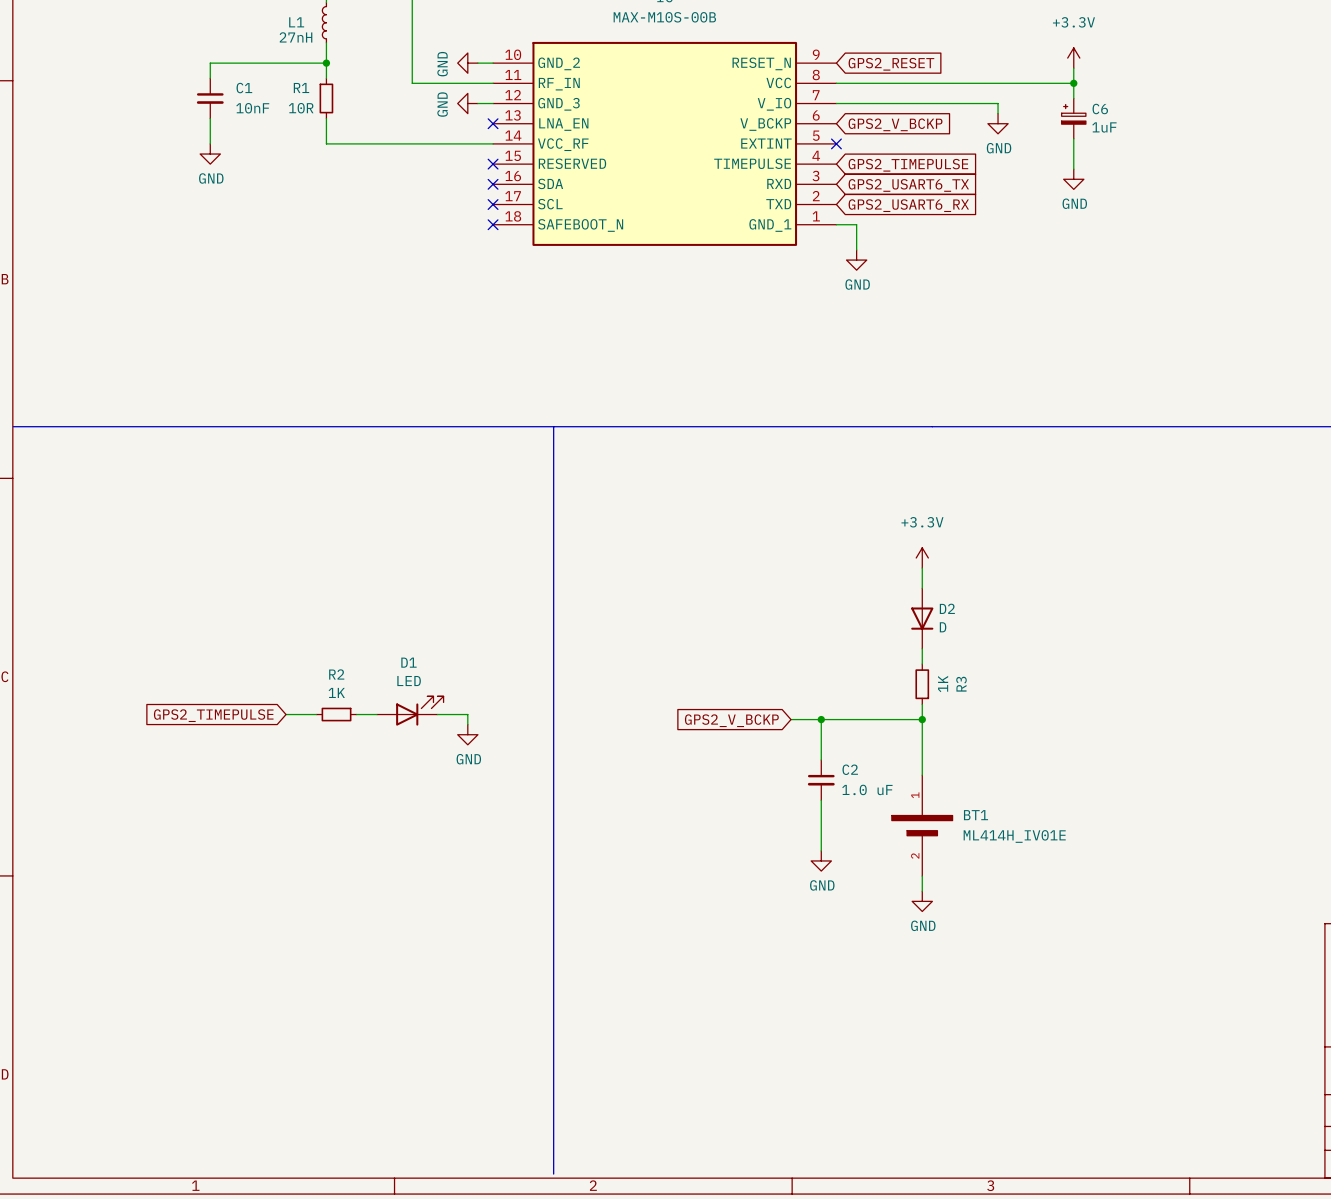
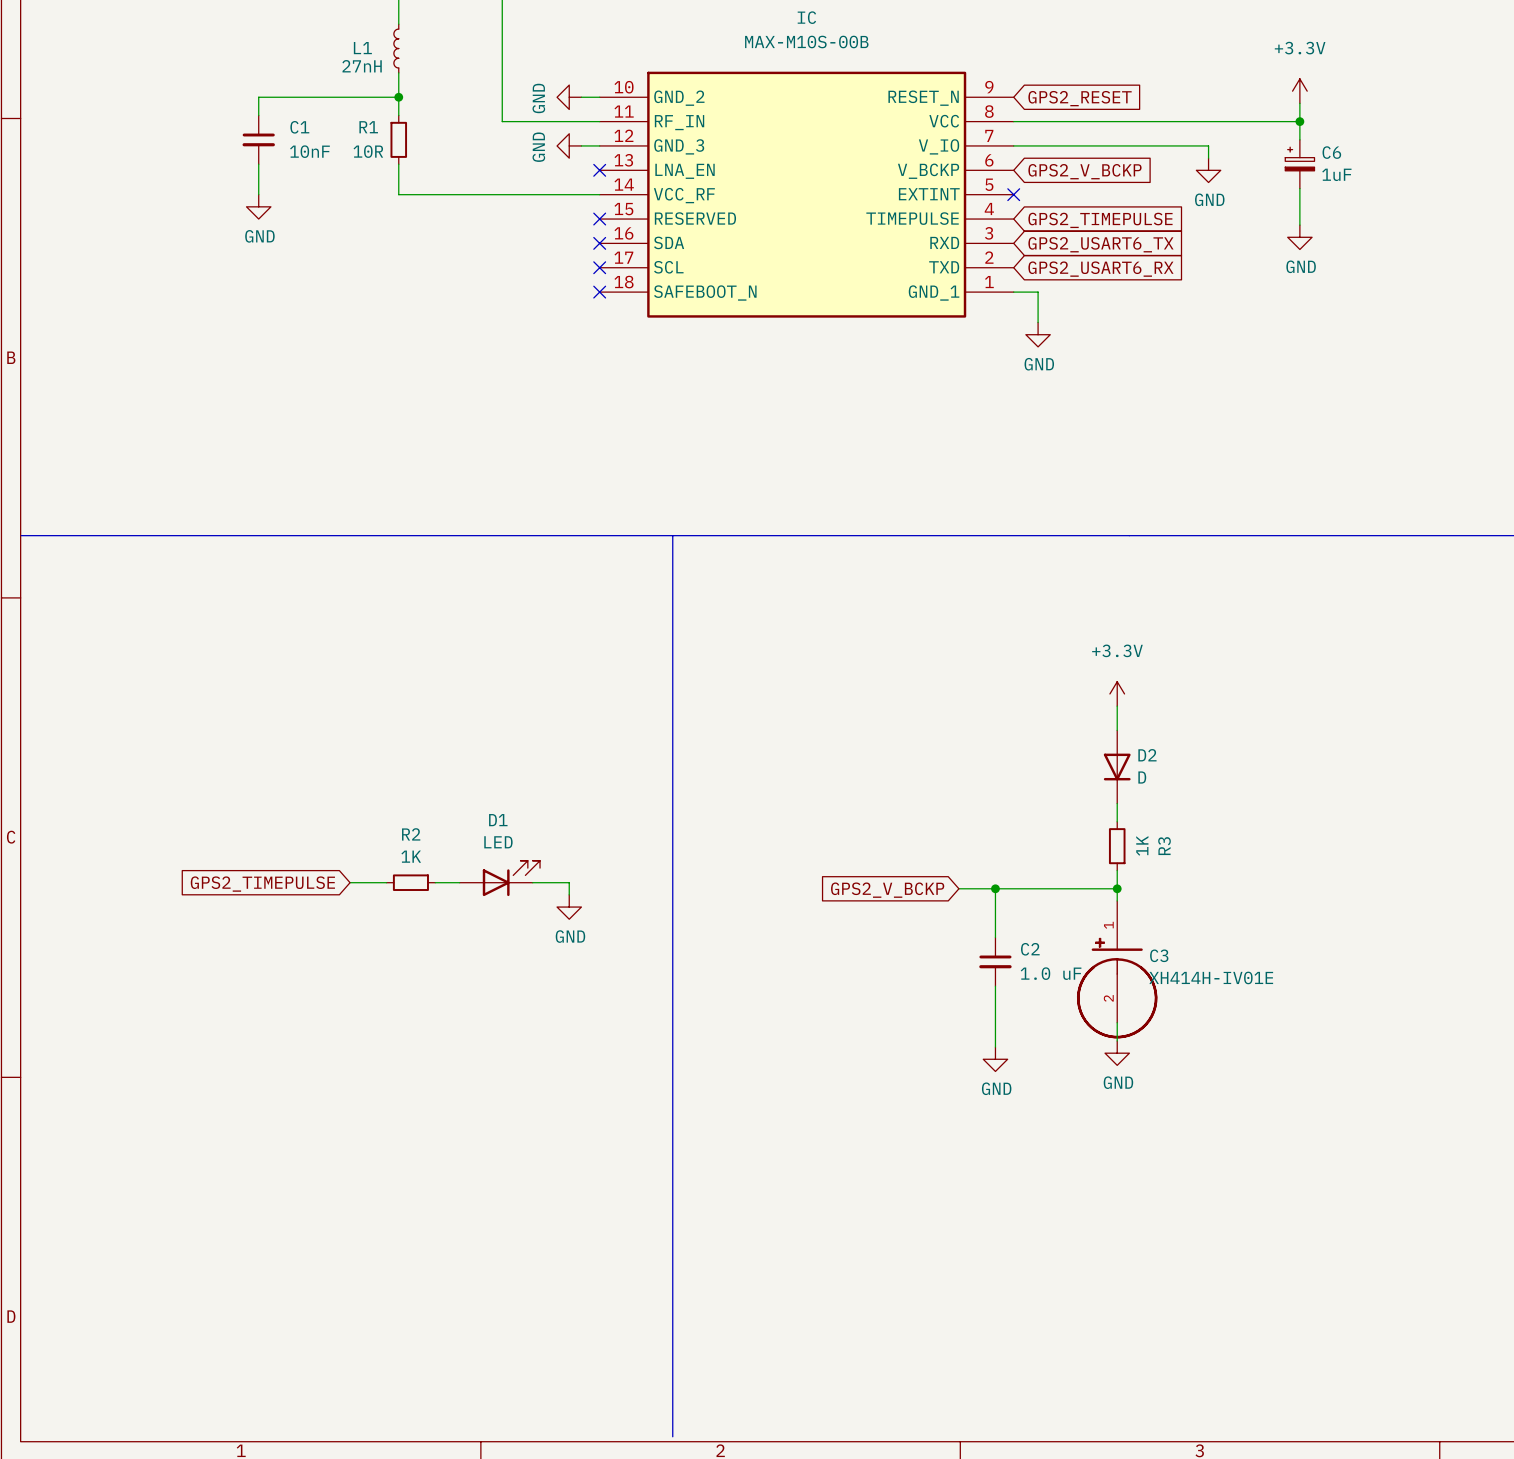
C3: none -> XH414H-IV01E (1117, 969)
BT1: ML414H_IV01E (922, 825) -> none
power symbol position: GND (922, 901) -> GND (1117, 1053)

